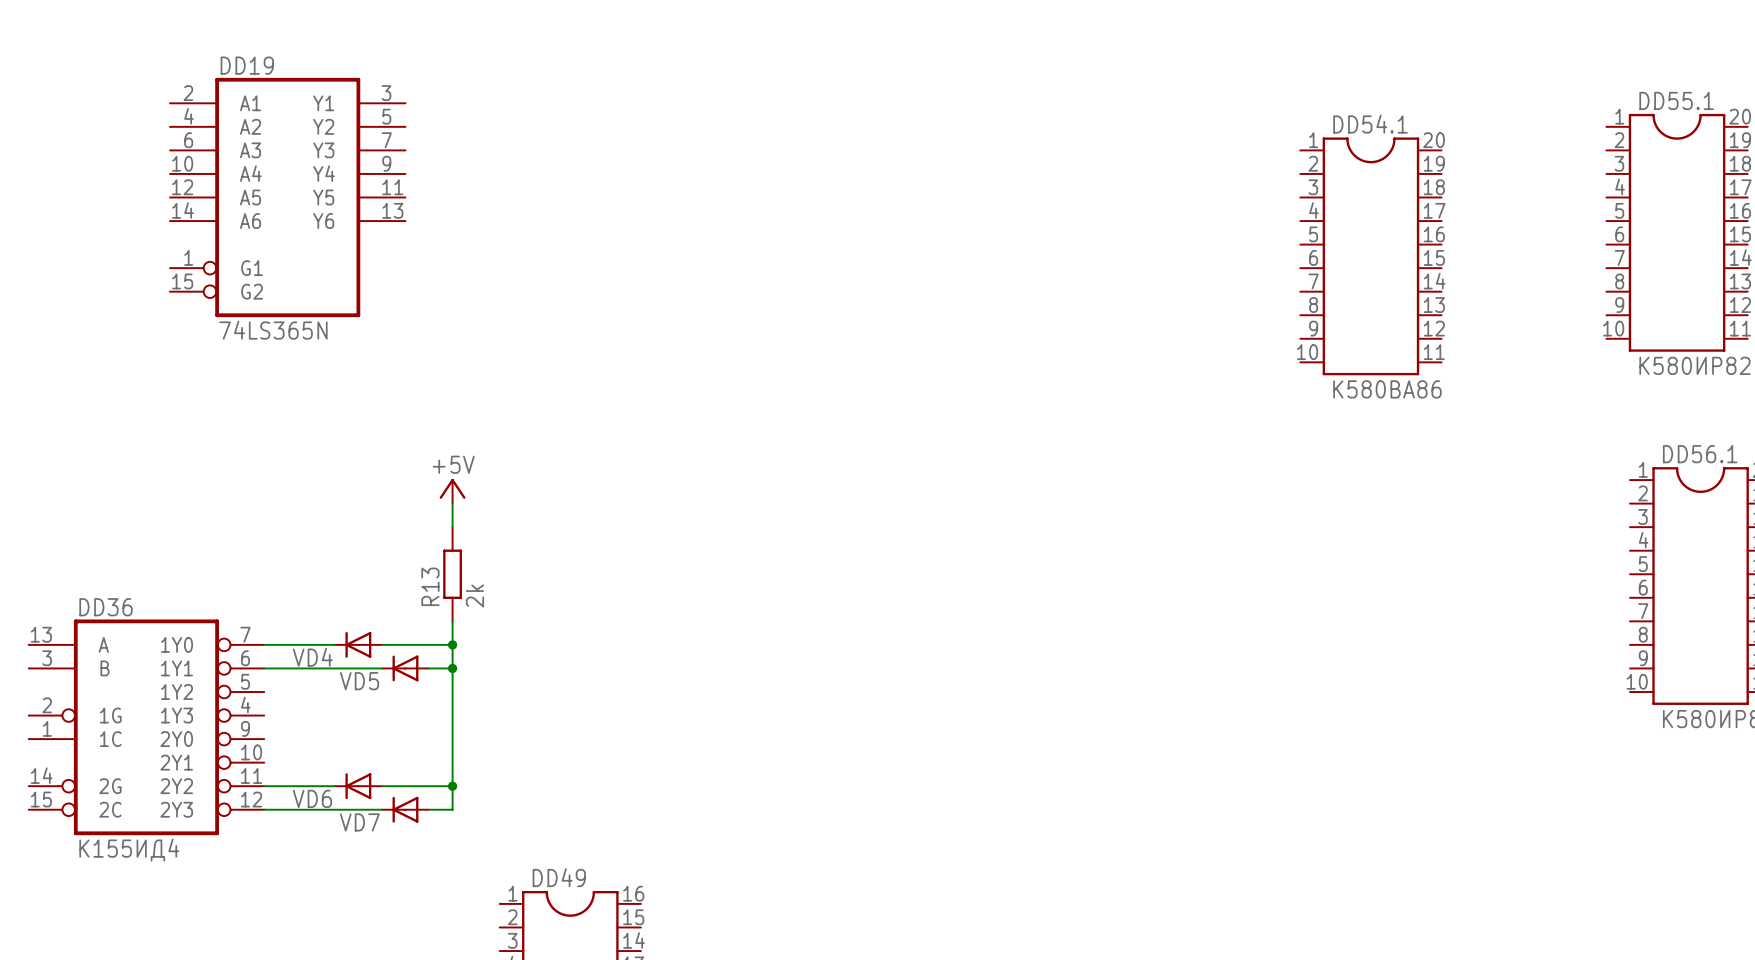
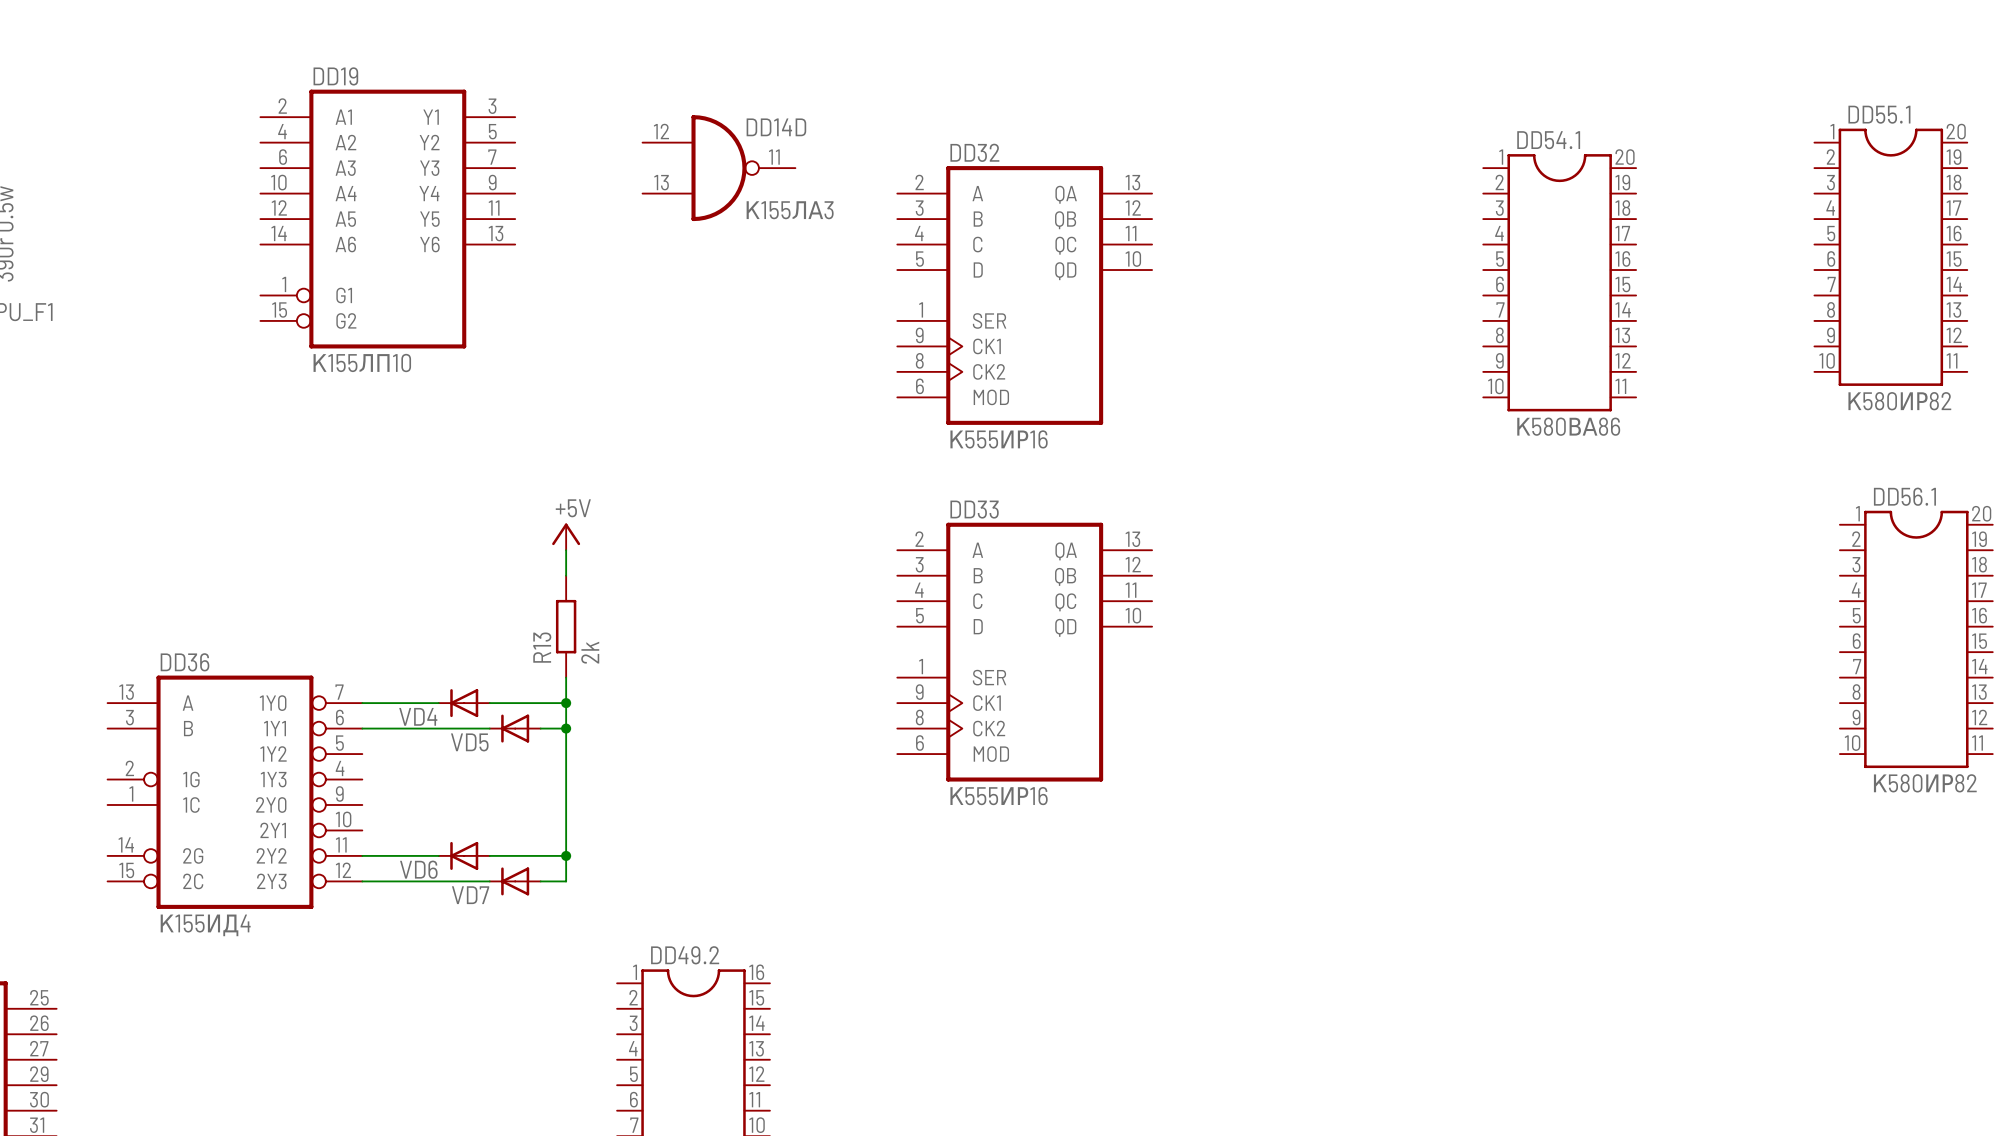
DD14D: none -> К155ЛА3 (718, 168)
DD32: none -> К555ИР16 (1024, 295)
DD19 value: 74LS365N (273, 330) -> К155ЛП10 (362, 363)
DD33: none -> К555ИР16 (1024, 652)
DD49 name: DD49 (559, 877) -> DD49.2 (685, 955)

